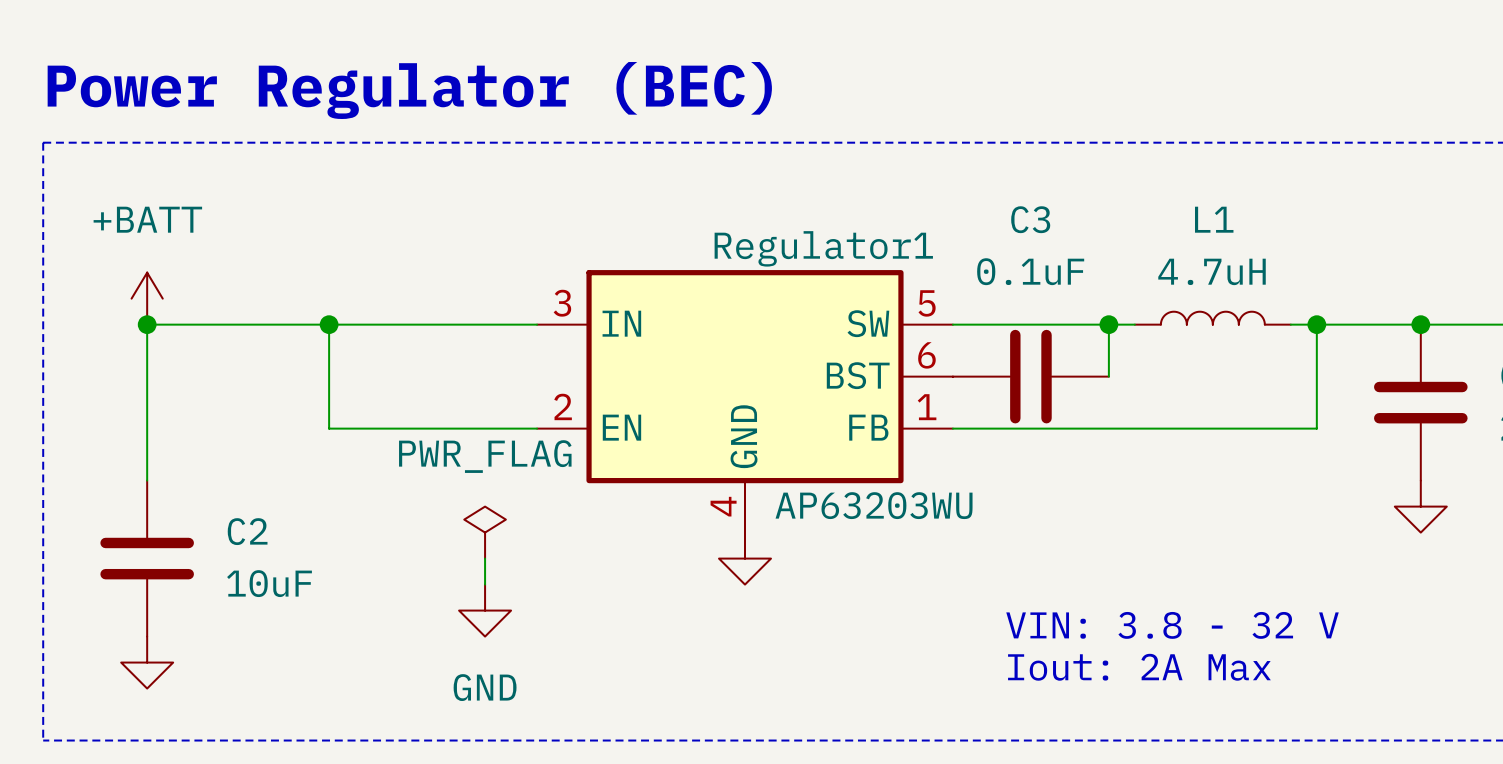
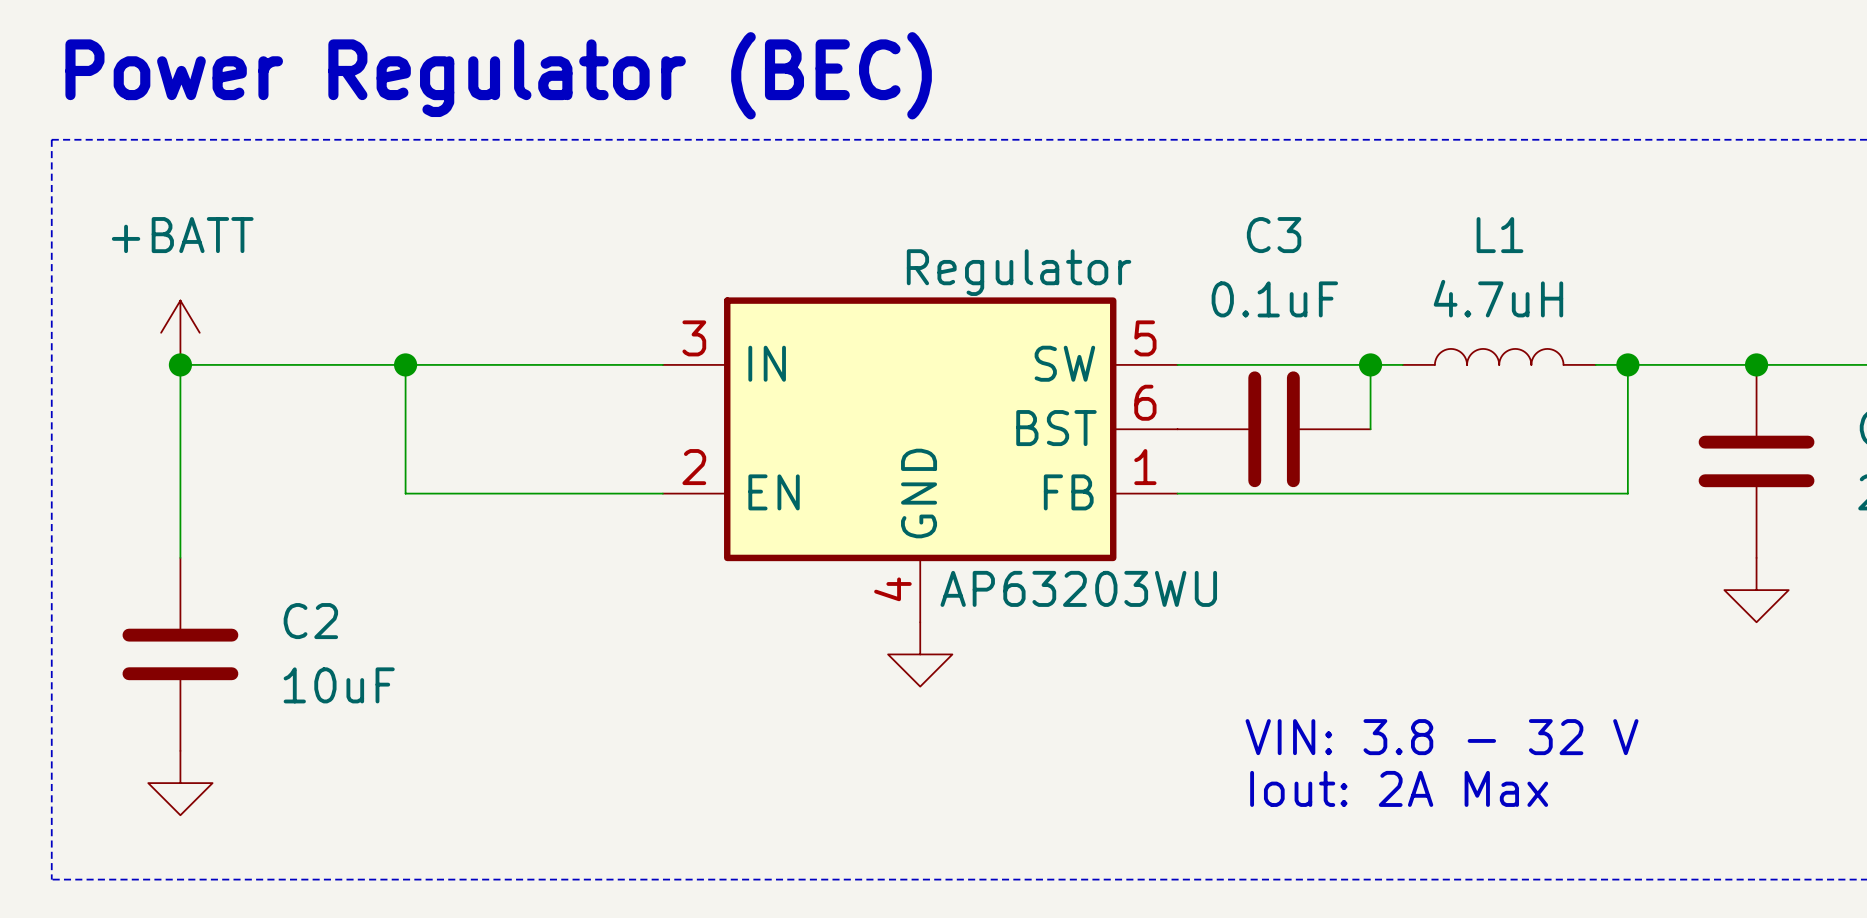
Regulator1 name: Regulator1 (823, 248) -> Regulator (1019, 272)
power symbol: PWR_FLAG (485, 532) -> none
wire: (485, 558) (485, 584) -> none
power symbol: GND (485, 610) -> none

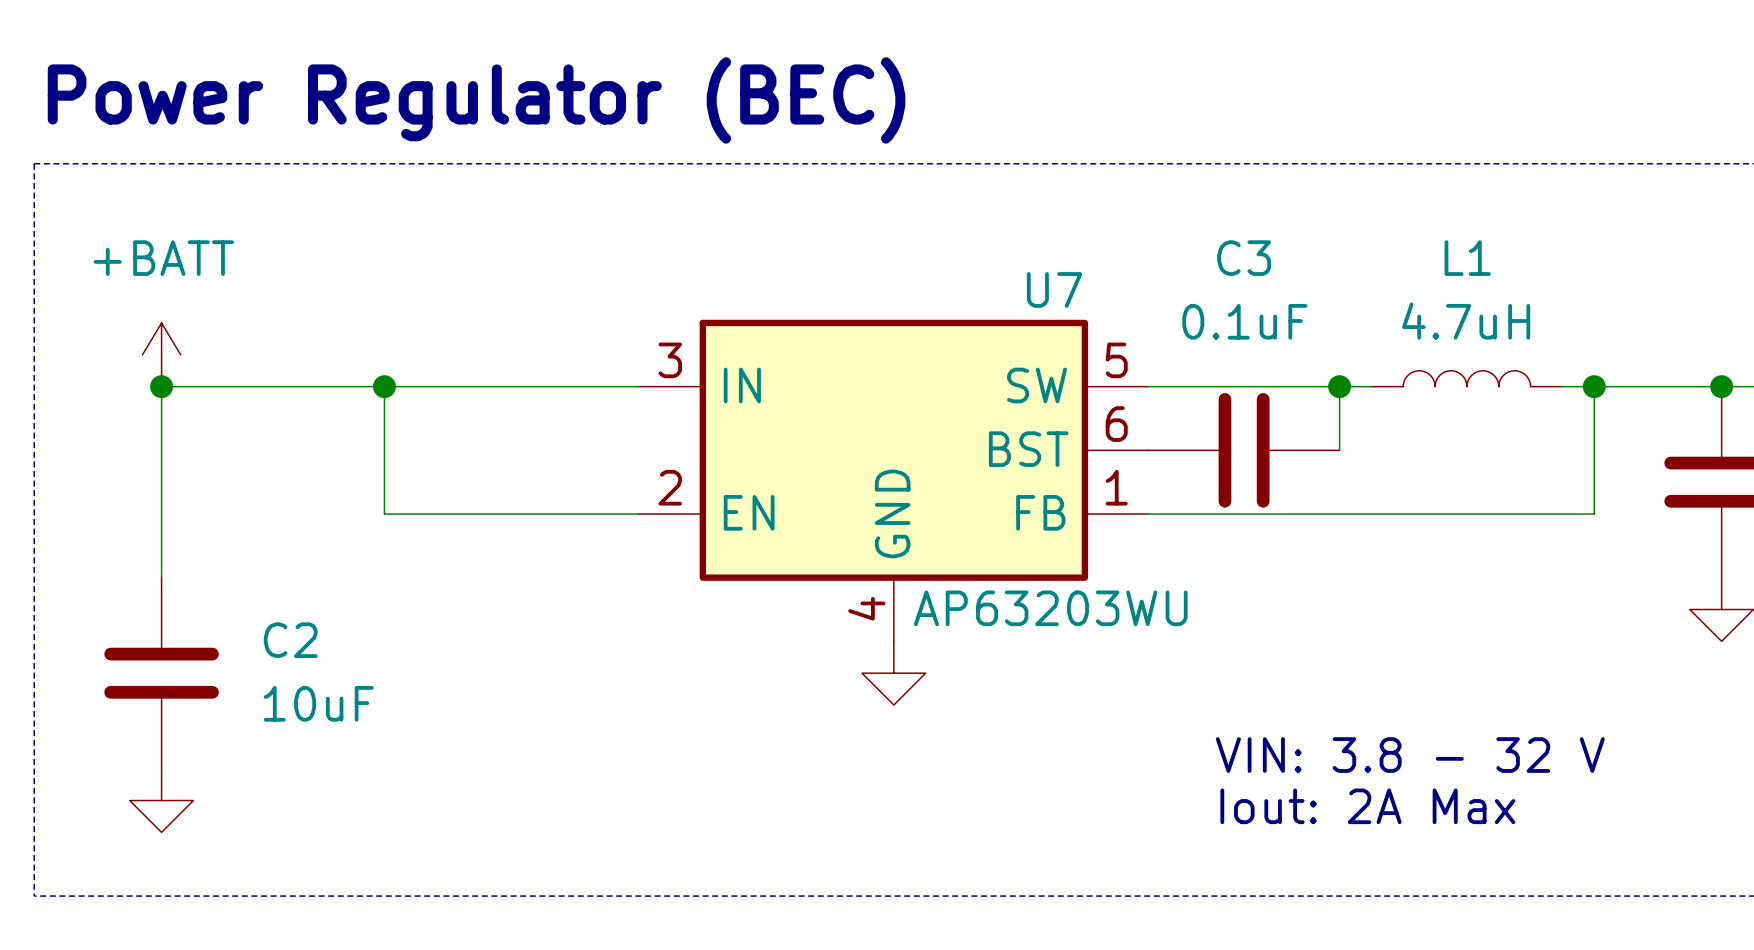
Regulator name: Regulator (1019, 272) -> U7 (1054, 289)

